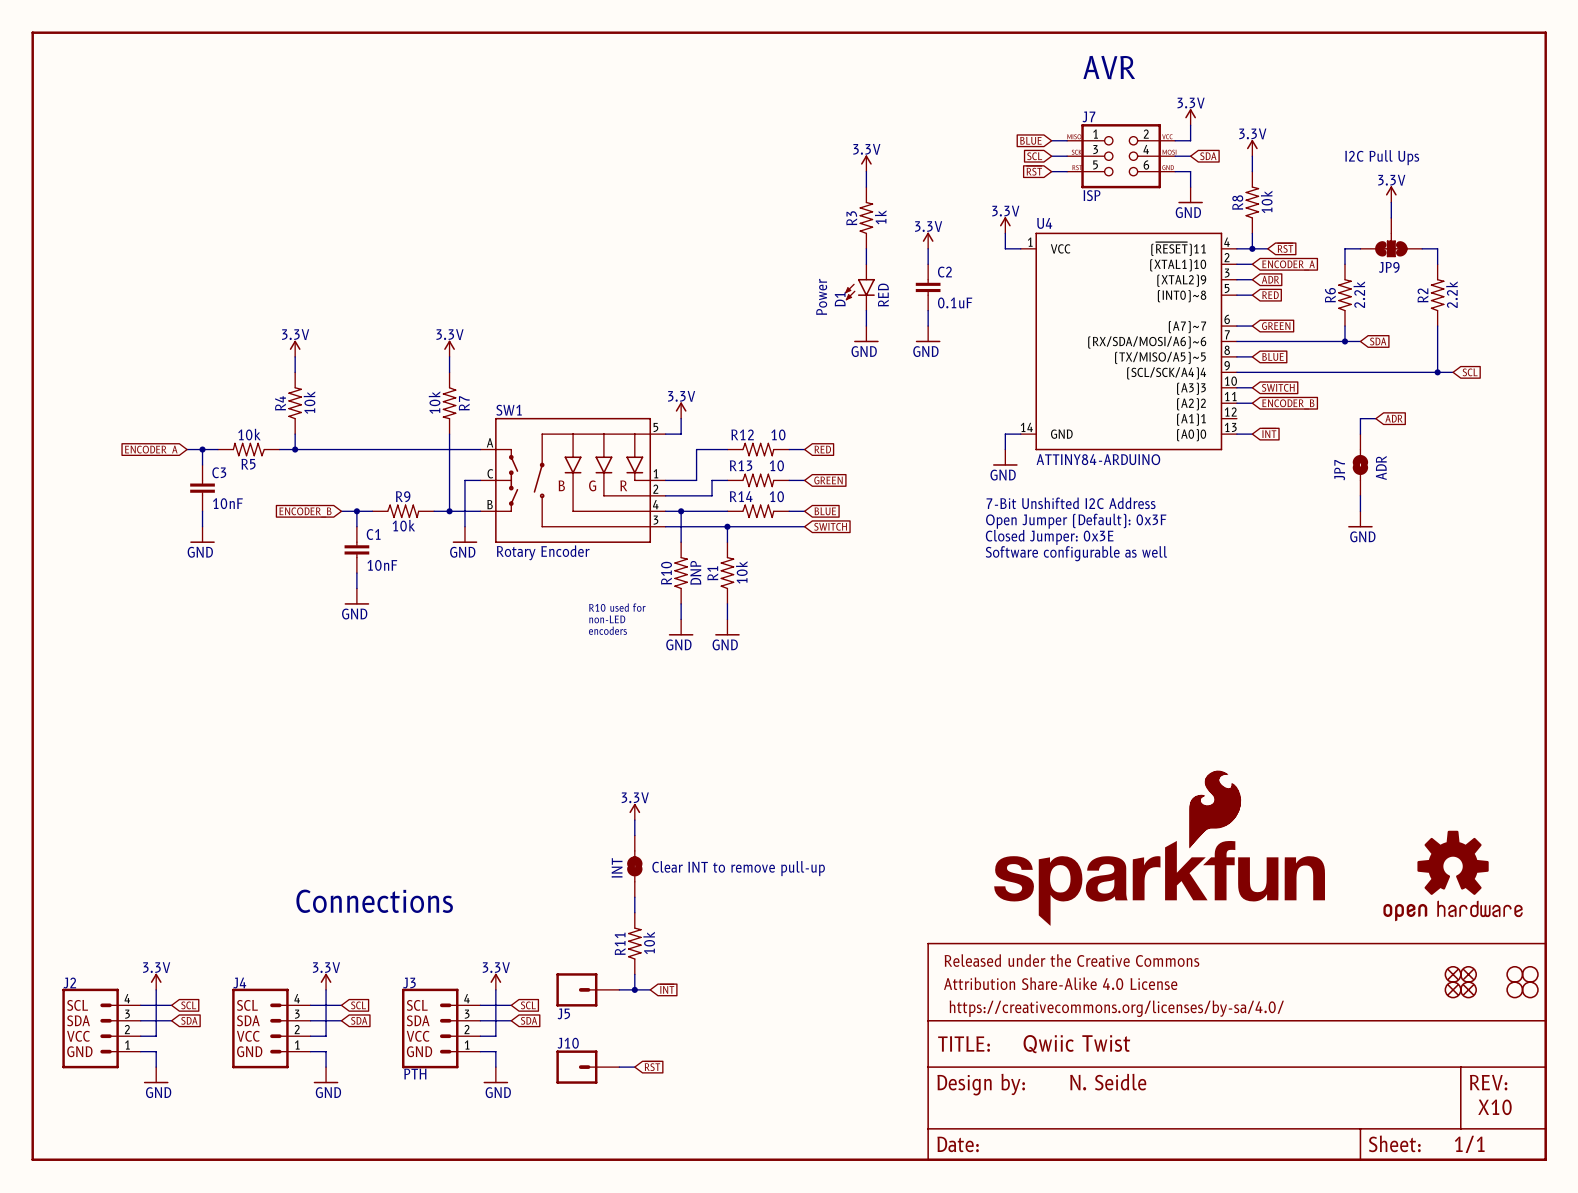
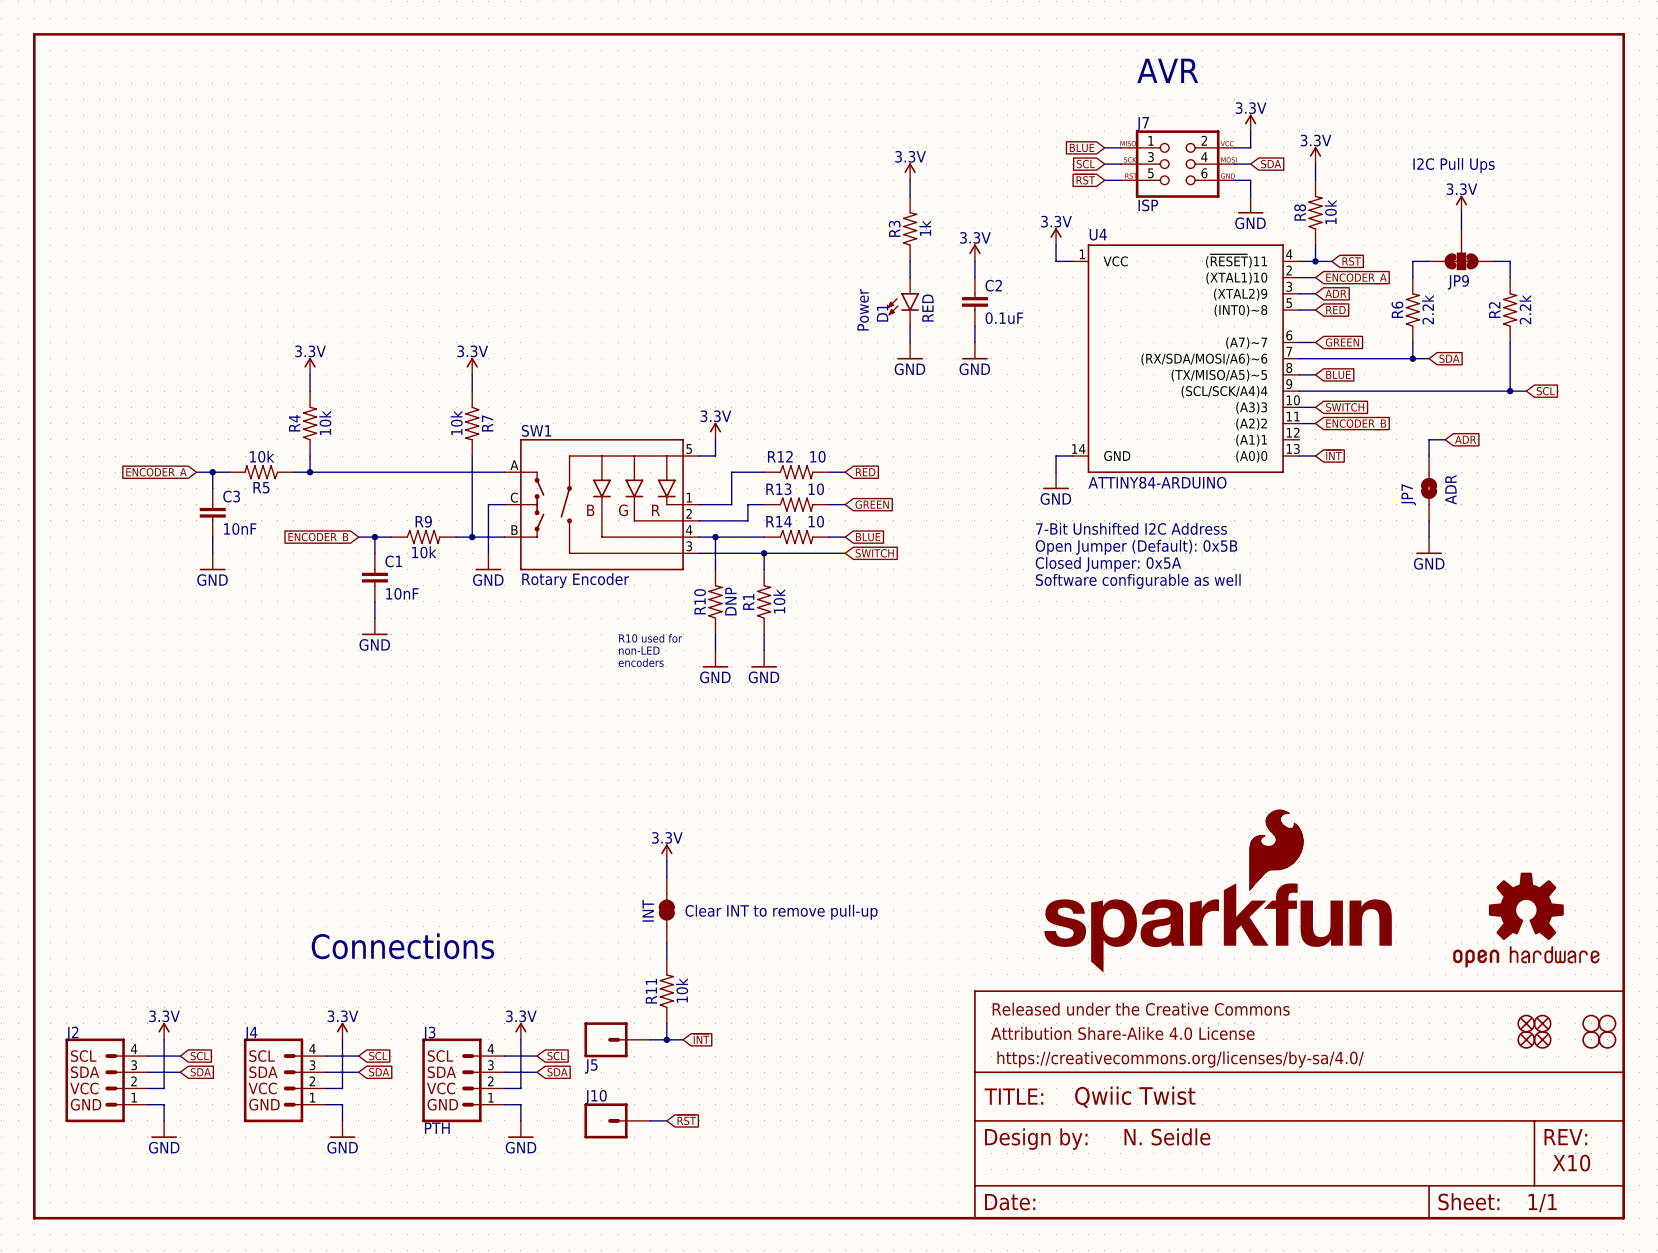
text: Open Jumper (Default): 0x3F (1076, 521) -> Open Jumper (Default): 0x5B (1136, 547)
text: Closed Jumper: 0x3E (1049, 537) -> Closed Jumper: 0x5A (1108, 564)

